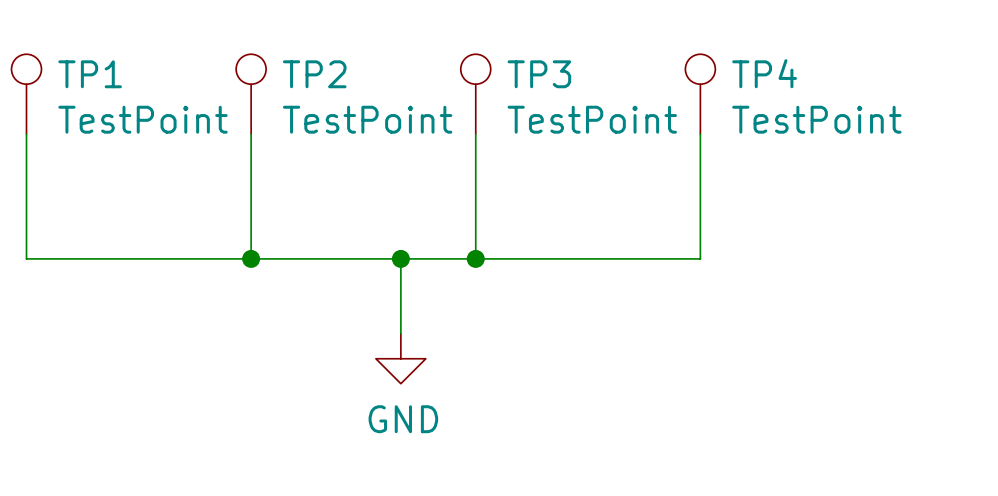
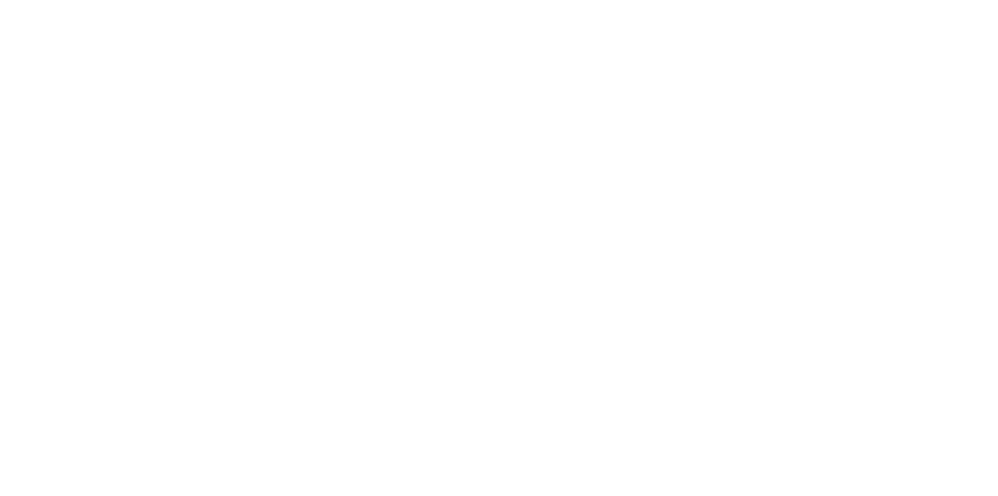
TP1: TestPoint (26, 94) -> none
TP2: TestPoint (251, 94) -> none
TP3: TestPoint (475, 94) -> none
TP4: TestPoint (700, 94) -> none
wire: (26, 134) (26, 258) (700, 258) (700, 134) -> none
wire: (251, 134) (251, 258) -> none
wire: (475, 134) (475, 258) -> none
junction: (251, 258) -> none
wire: (400, 258) (400, 333) -> none
junction: (400, 258) -> none
junction: (475, 258) -> none
power symbol: GND (400, 358) -> none

